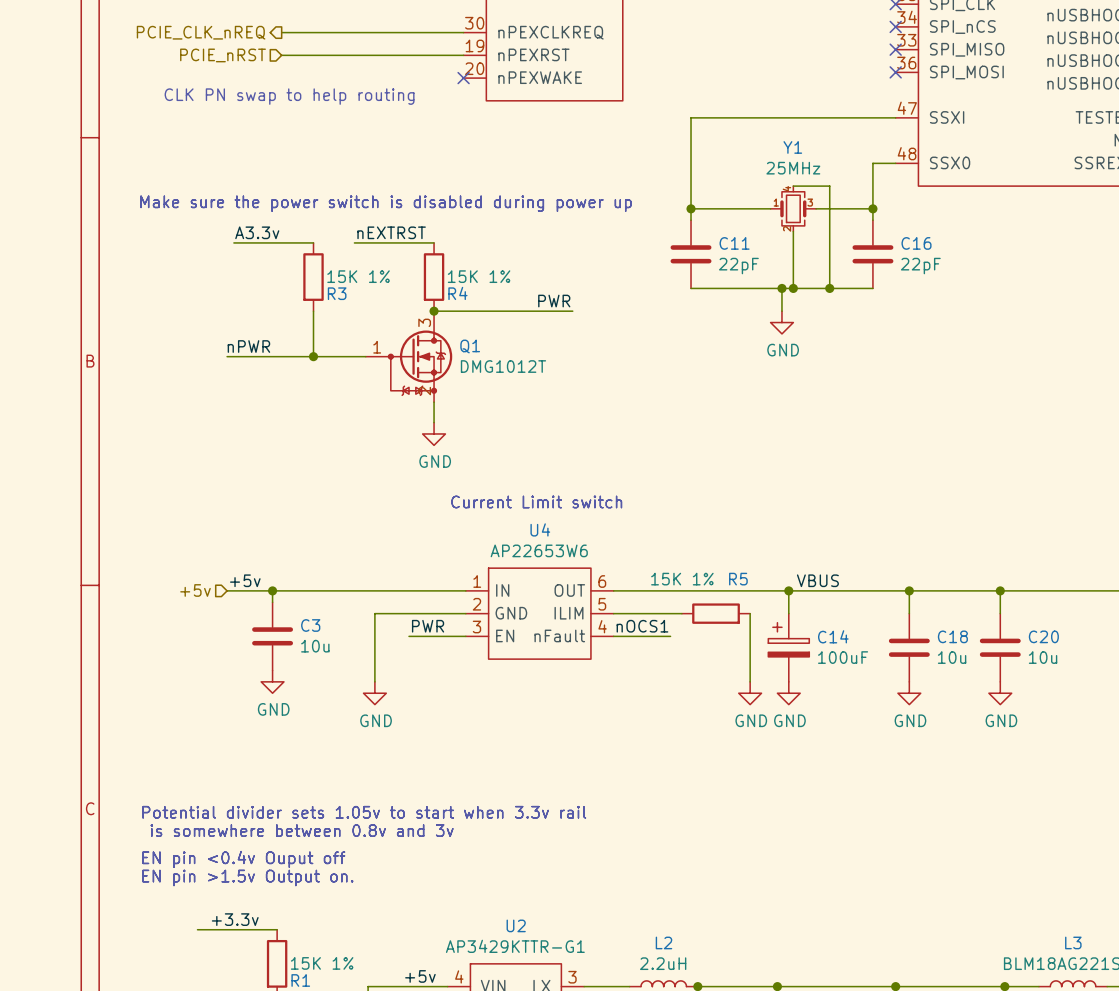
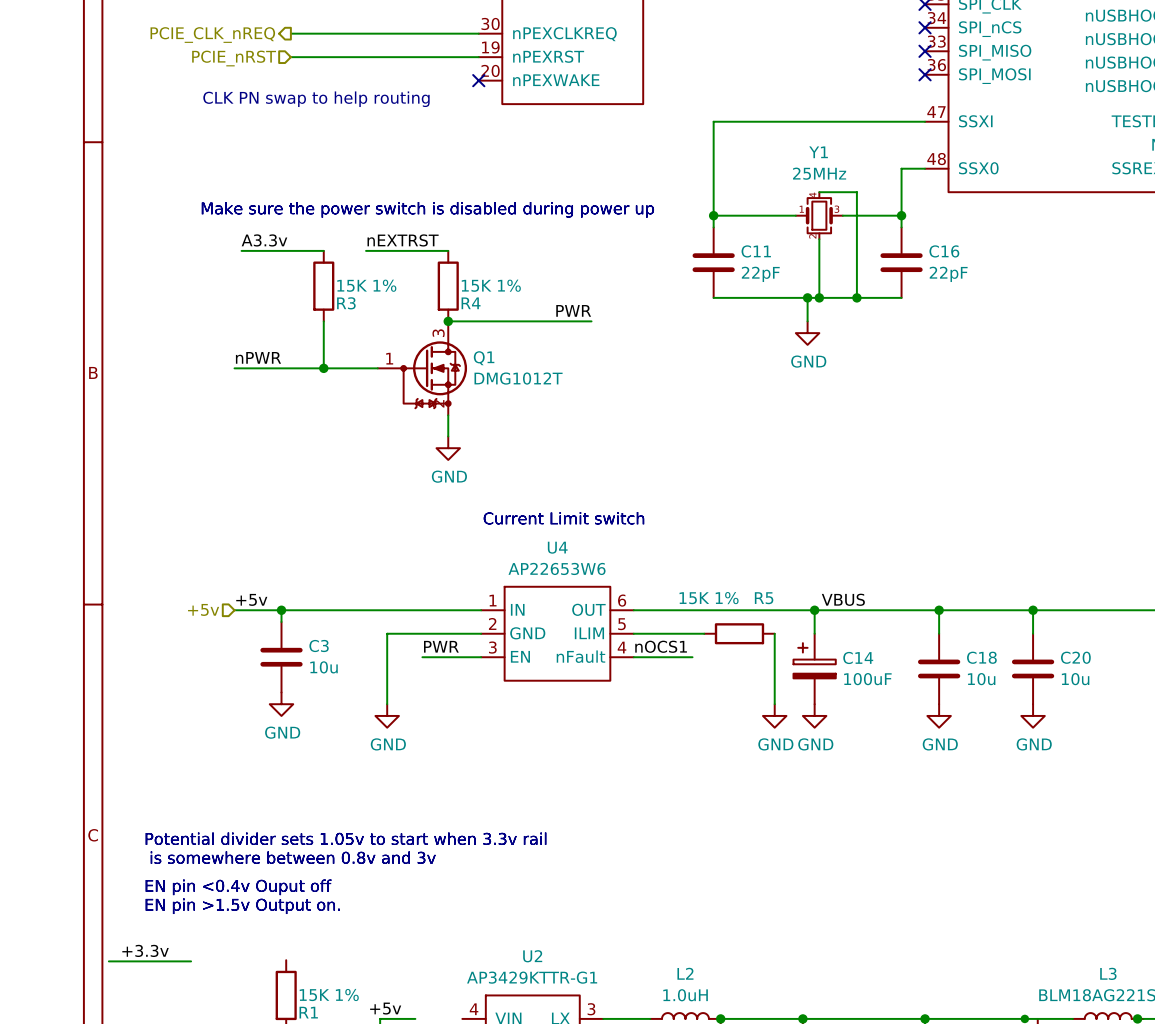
label position: +3.3v (235, 919) -> +3.3v (145, 950)
wire: (197, 929) (277, 929) -> (108, 961) (191, 961)
L2 value: 2.2uH (663, 963) -> 1.0uH (685, 995)
label position: +5v (420, 976) -> +5v (385, 1008)
wire: (402, 986) (447, 986) -> none
junction: none -> (1024, 1018)
junction: (1004, 986) -> none
junction: none -> (1137, 1018)

